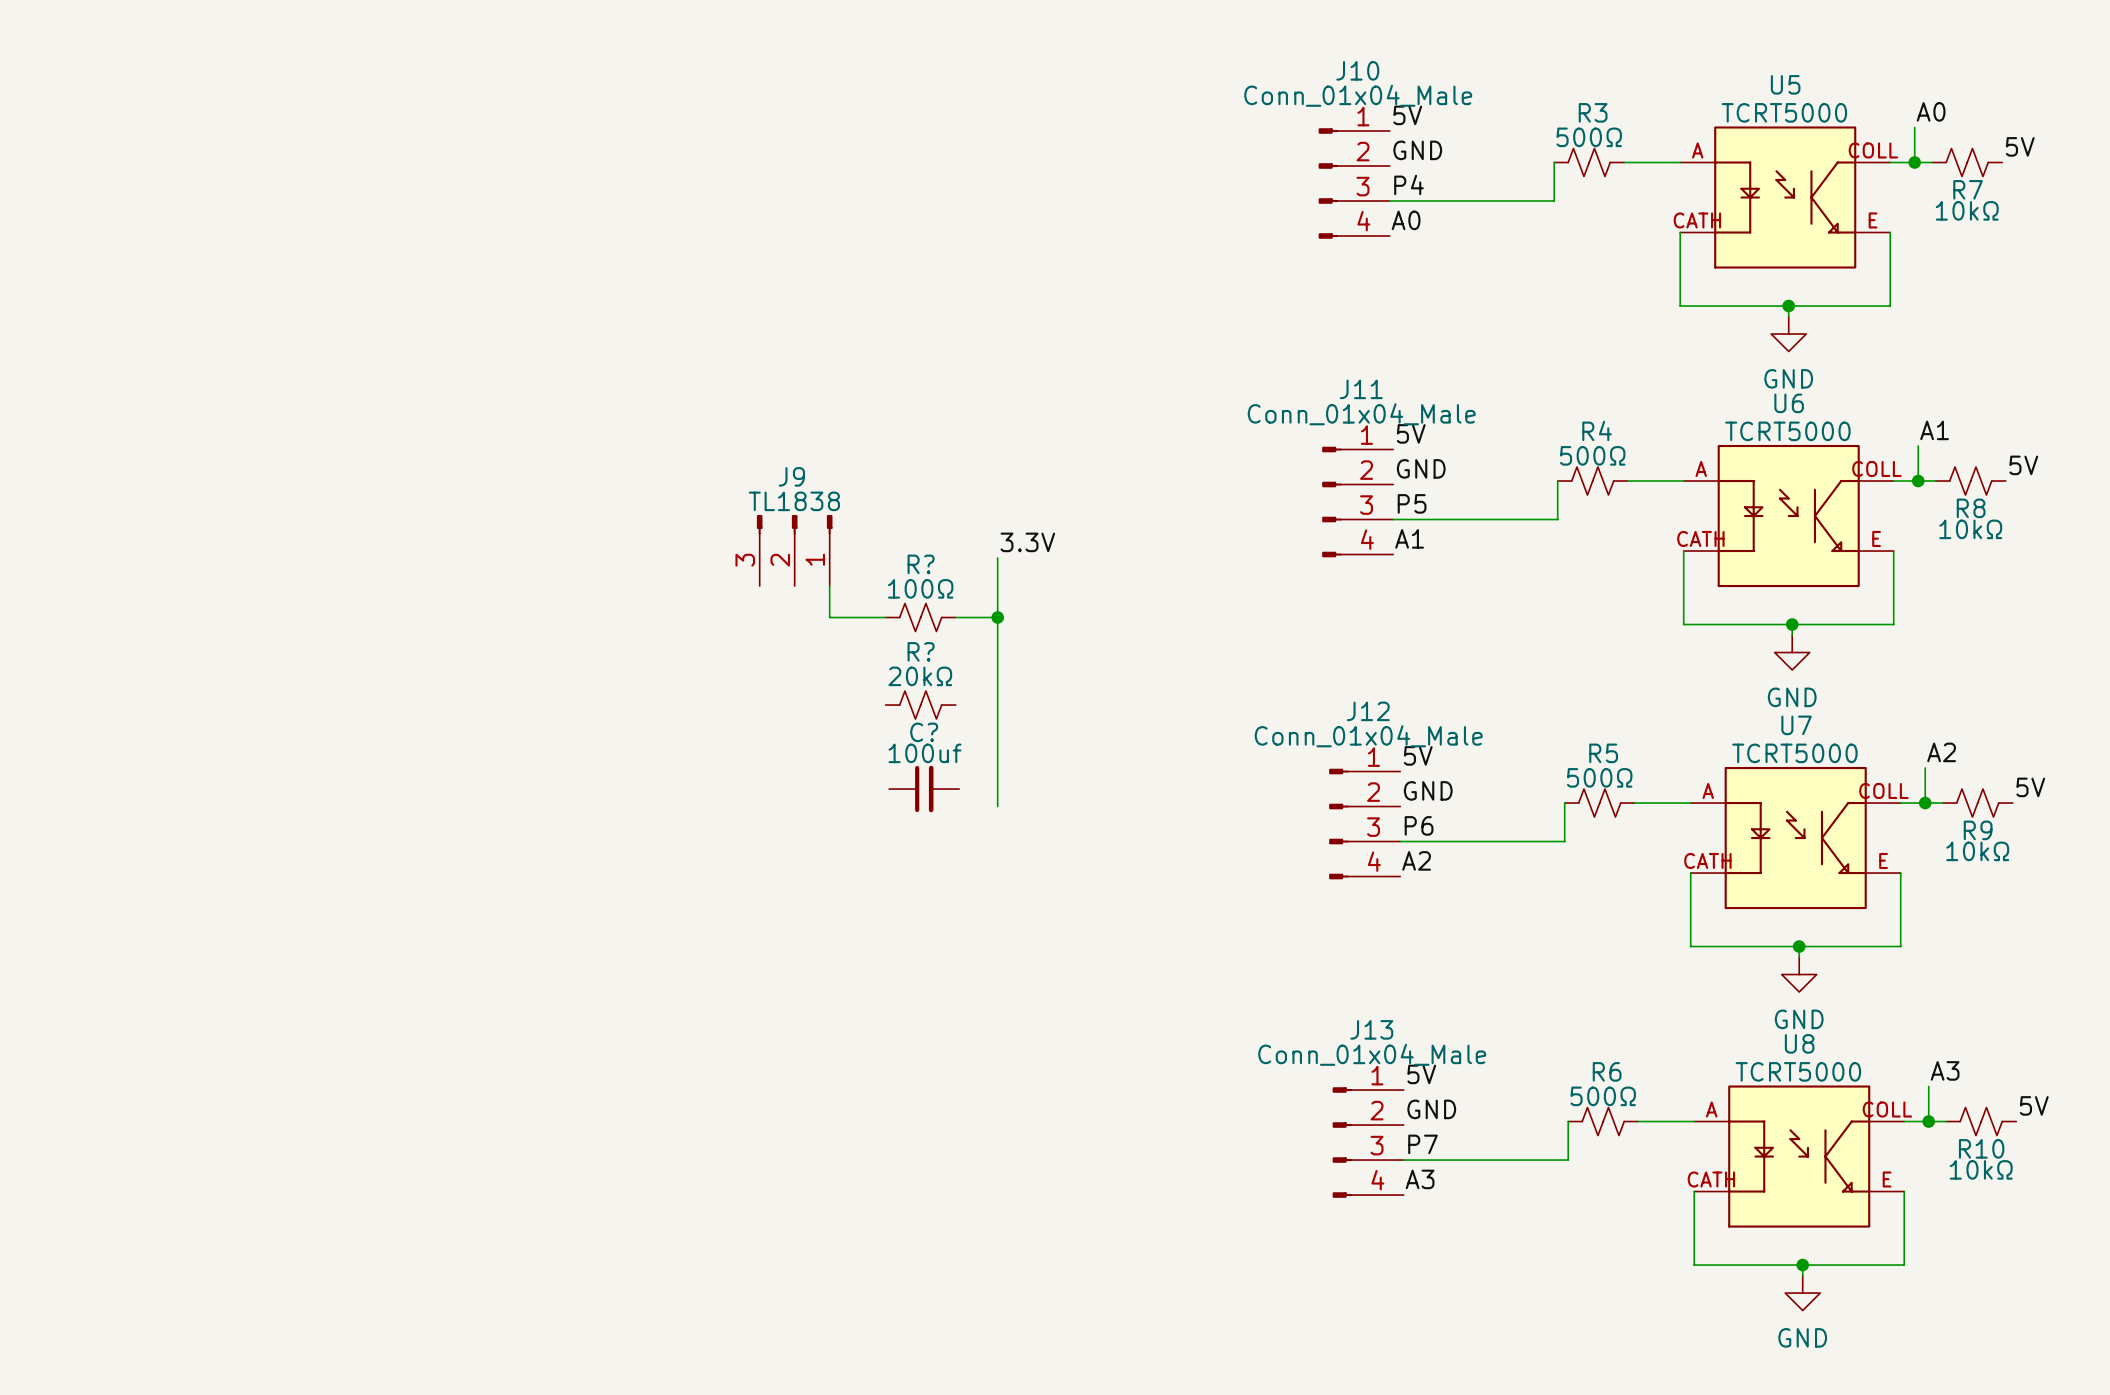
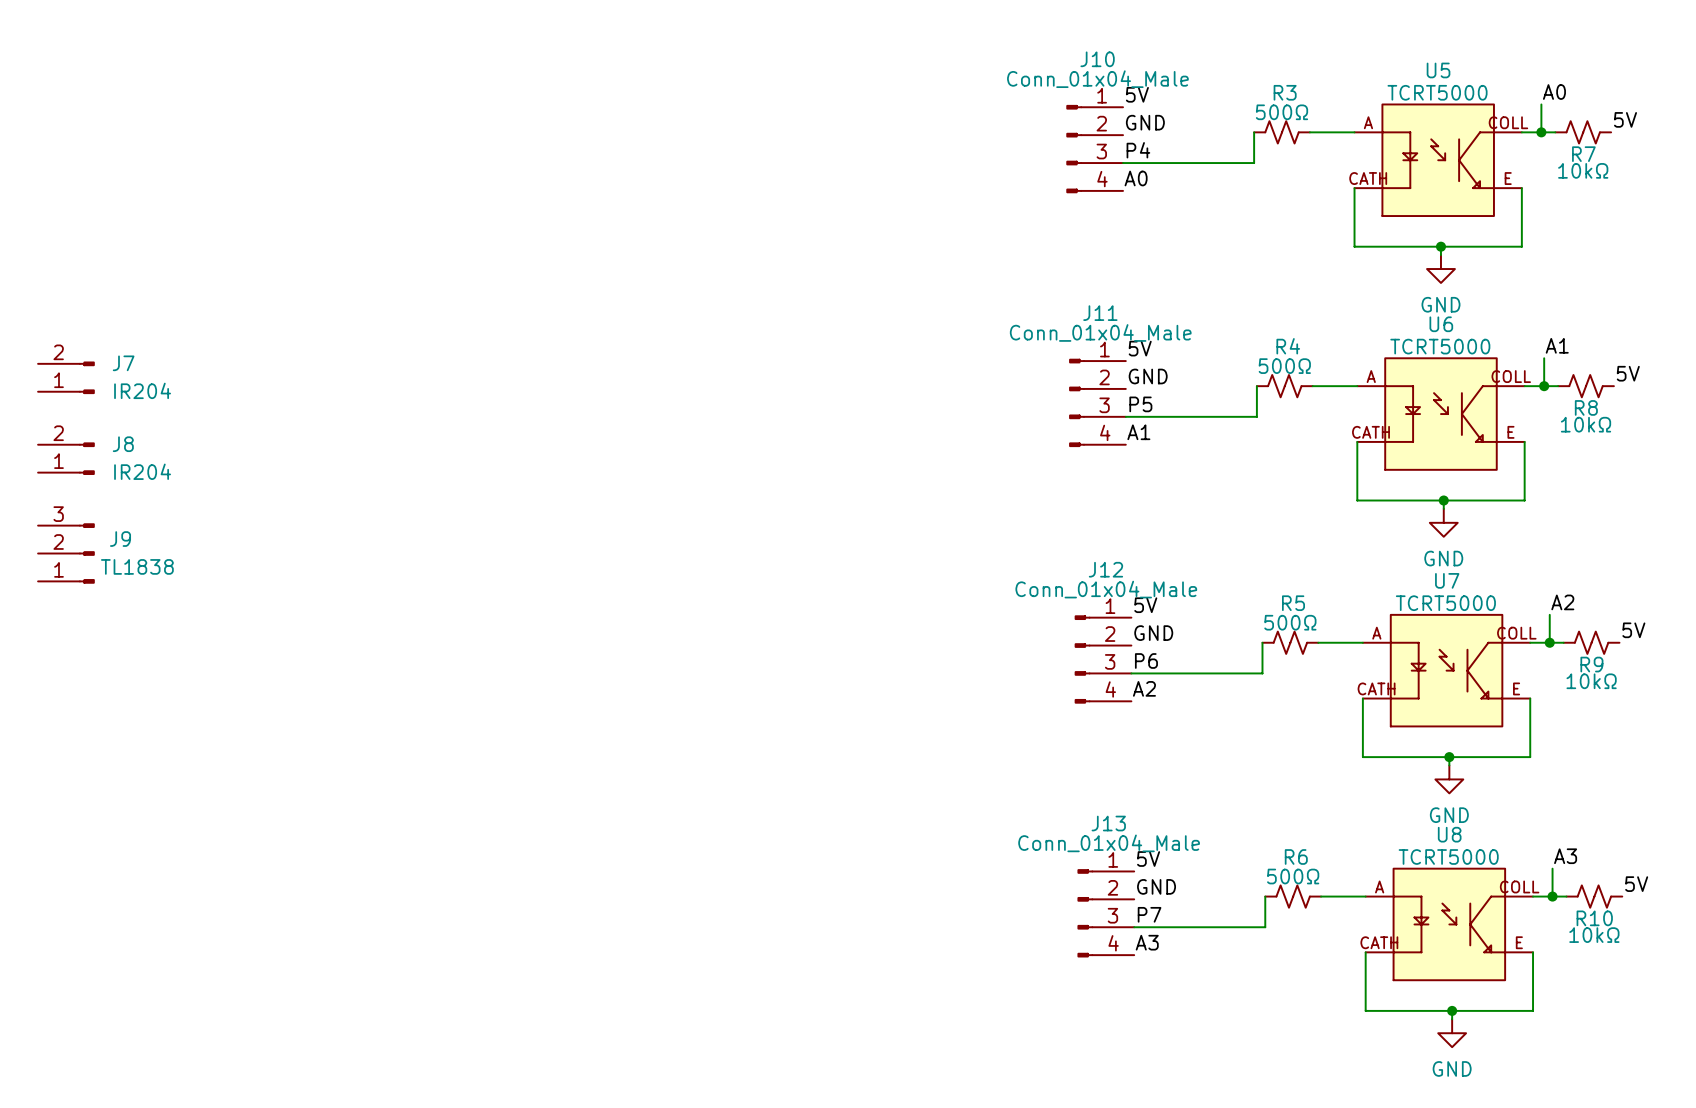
J7: none -> IR204 (66, 377)
J9 value position: TL1838 (794, 501) -> TL1838 (137, 566)
J9 rotation: 0° (794, 524) -> 90° clockwise (86, 553)
label: 3.3V (1027, 542) -> none
J9 position: (794, 550) -> (66, 553)
wire: (997, 558) (997, 806) -> none
J8: none -> IR204 (66, 458)
wire: (829, 586) (829, 617) (885, 617) -> none
R?: 100Ω (920, 617) -> none
wire: (955, 617) (997, 617) -> none
junction: (997, 617) -> none
R?: 20kΩ (920, 705) -> none
C?: 100uf (924, 789) -> none

